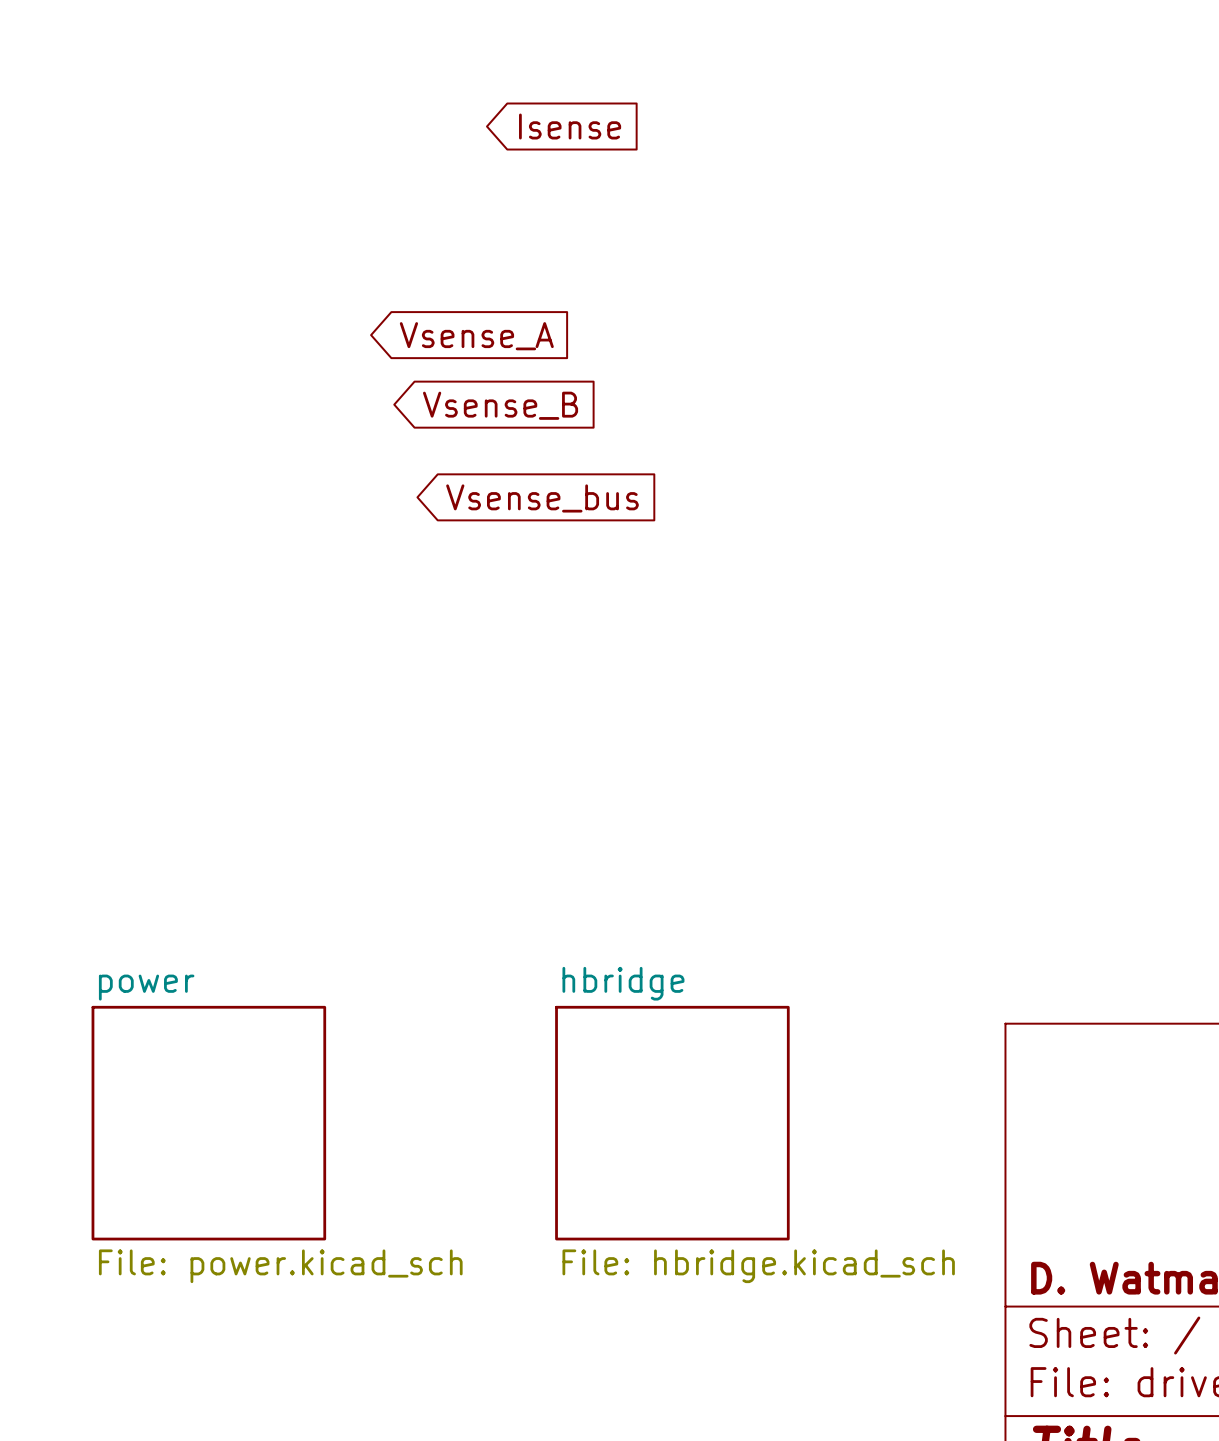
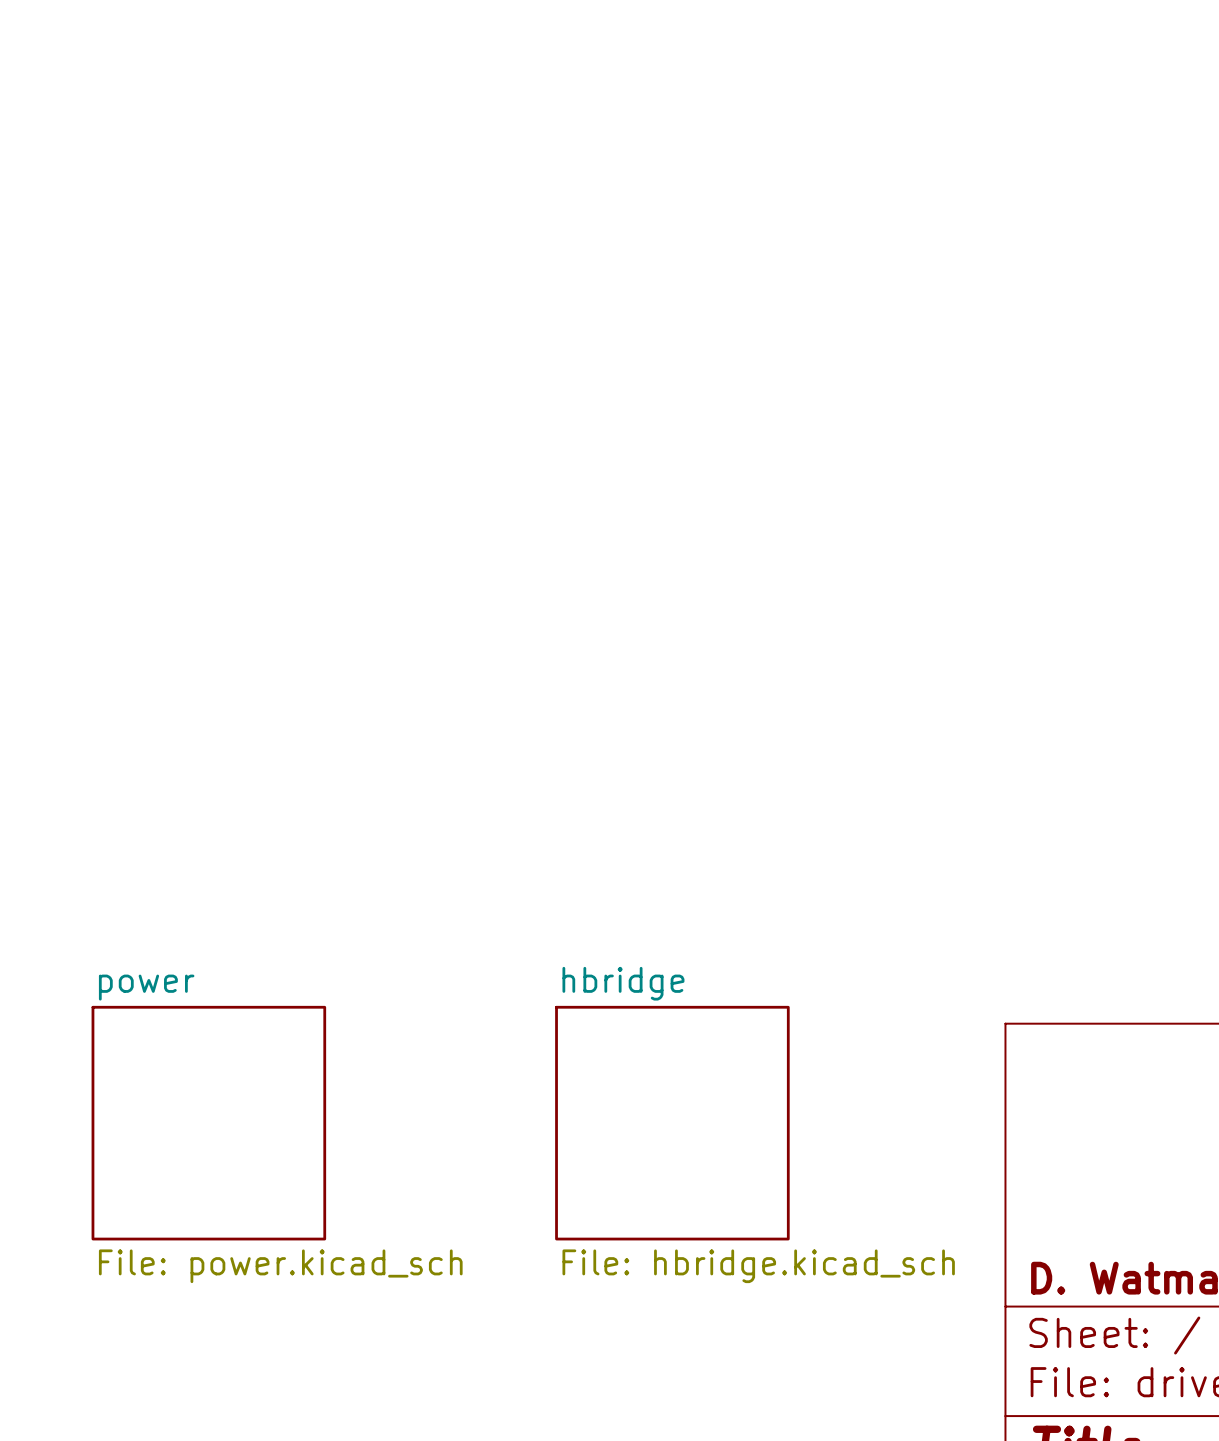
global label: Isense (570, 126) -> none
global label: Vsense_A (476, 336) -> none
global label: Vsense_B (500, 405) -> none
global label: Vsense_bus (542, 498) -> none

